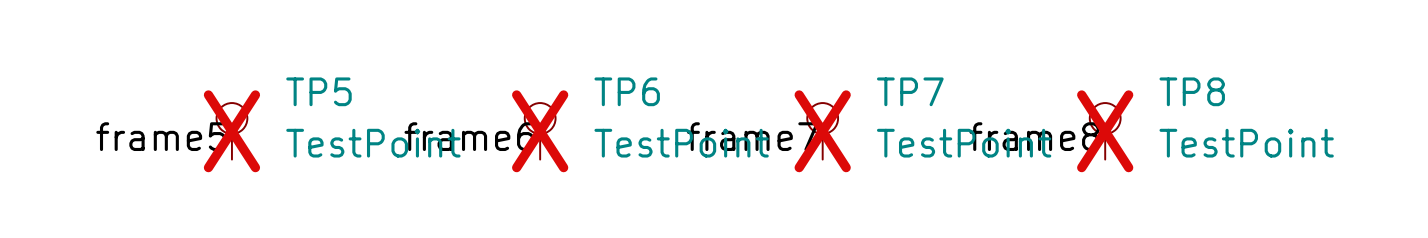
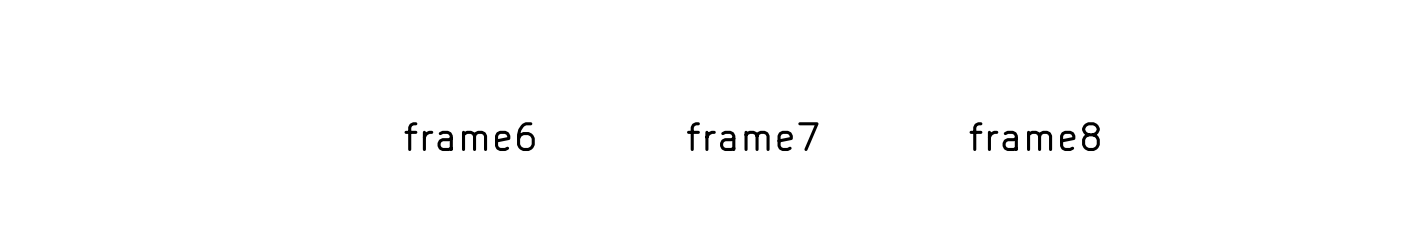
TP5: TestPoint (231, 131) -> none
TP6: TestPoint (540, 131) -> none
TP7: TestPoint (822, 131) -> none
TP8: TestPoint (1105, 131) -> none
label: frame5 (161, 136) -> none

